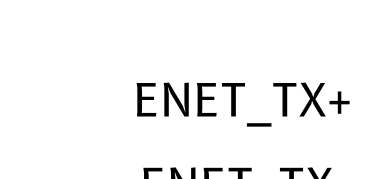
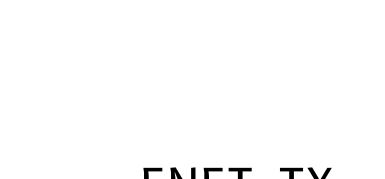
label: ENET_TX+ (243, 104) -> none

